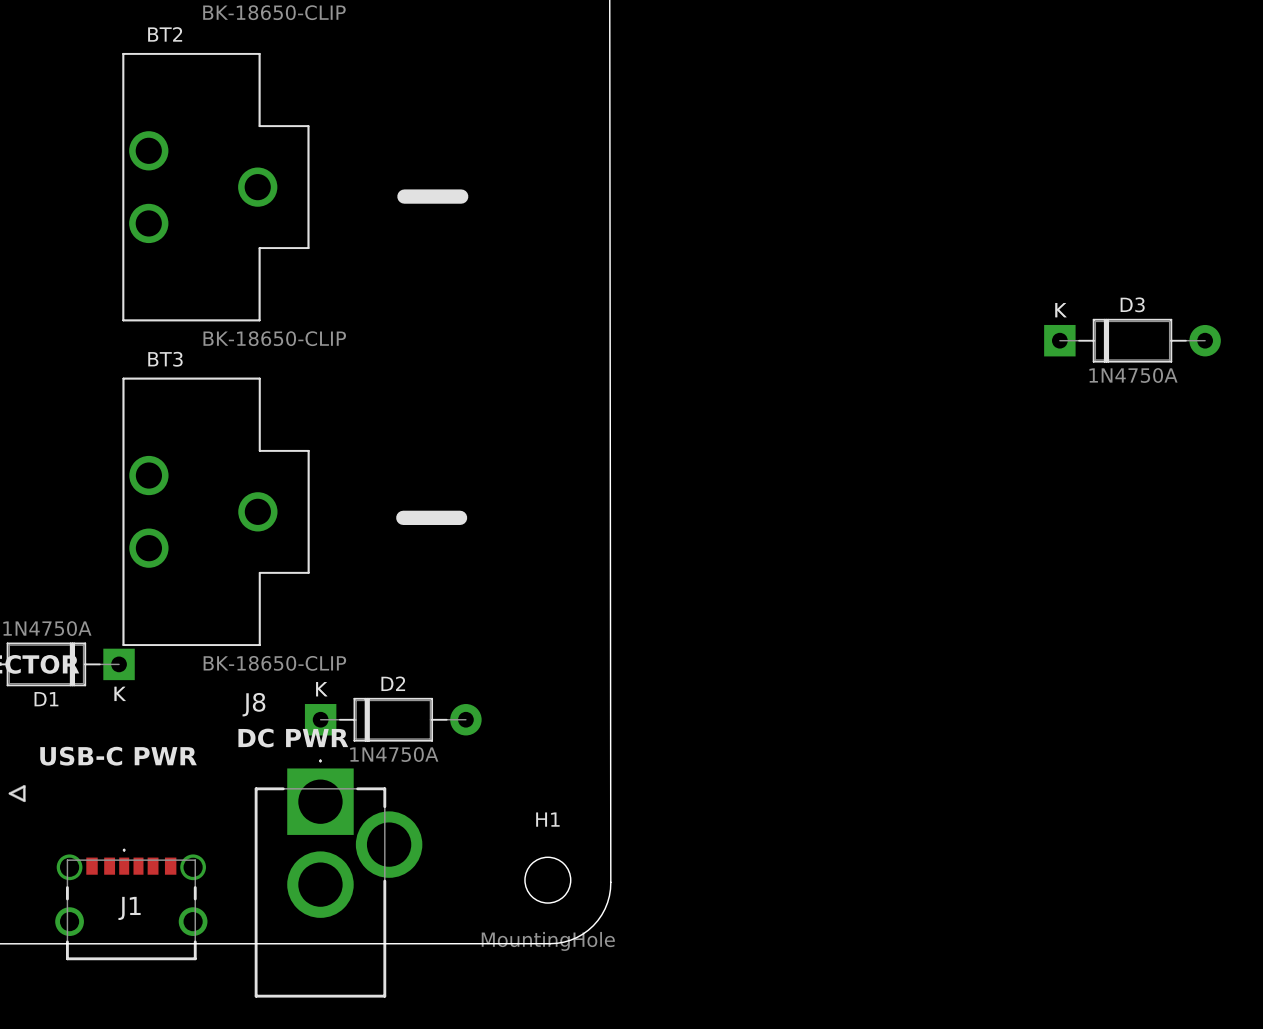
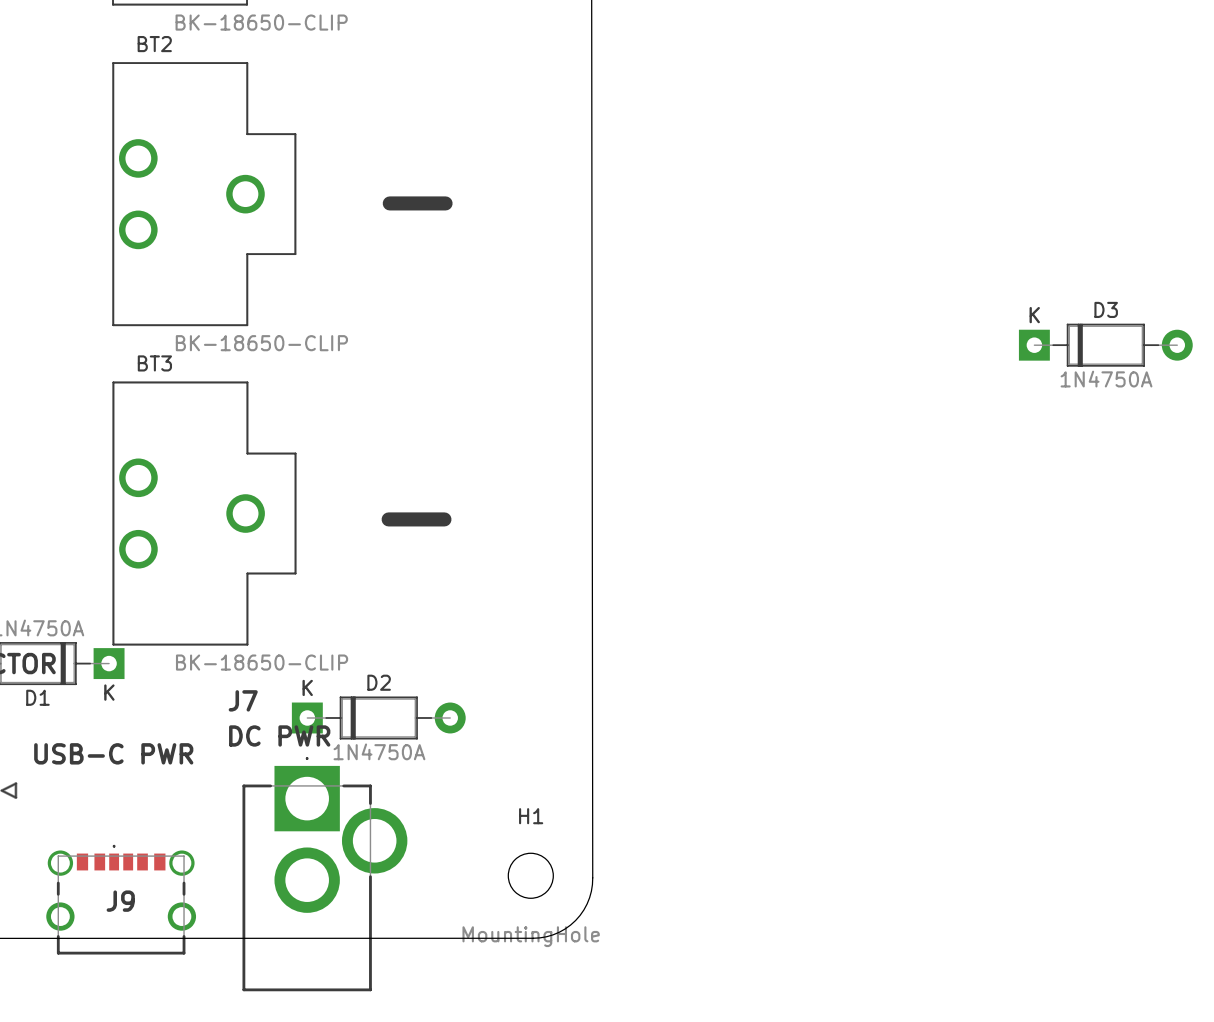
J8 name: J8 (253, 704) -> J7 (243, 700)
J1 name: J1 (129, 908) -> J9 (120, 901)

